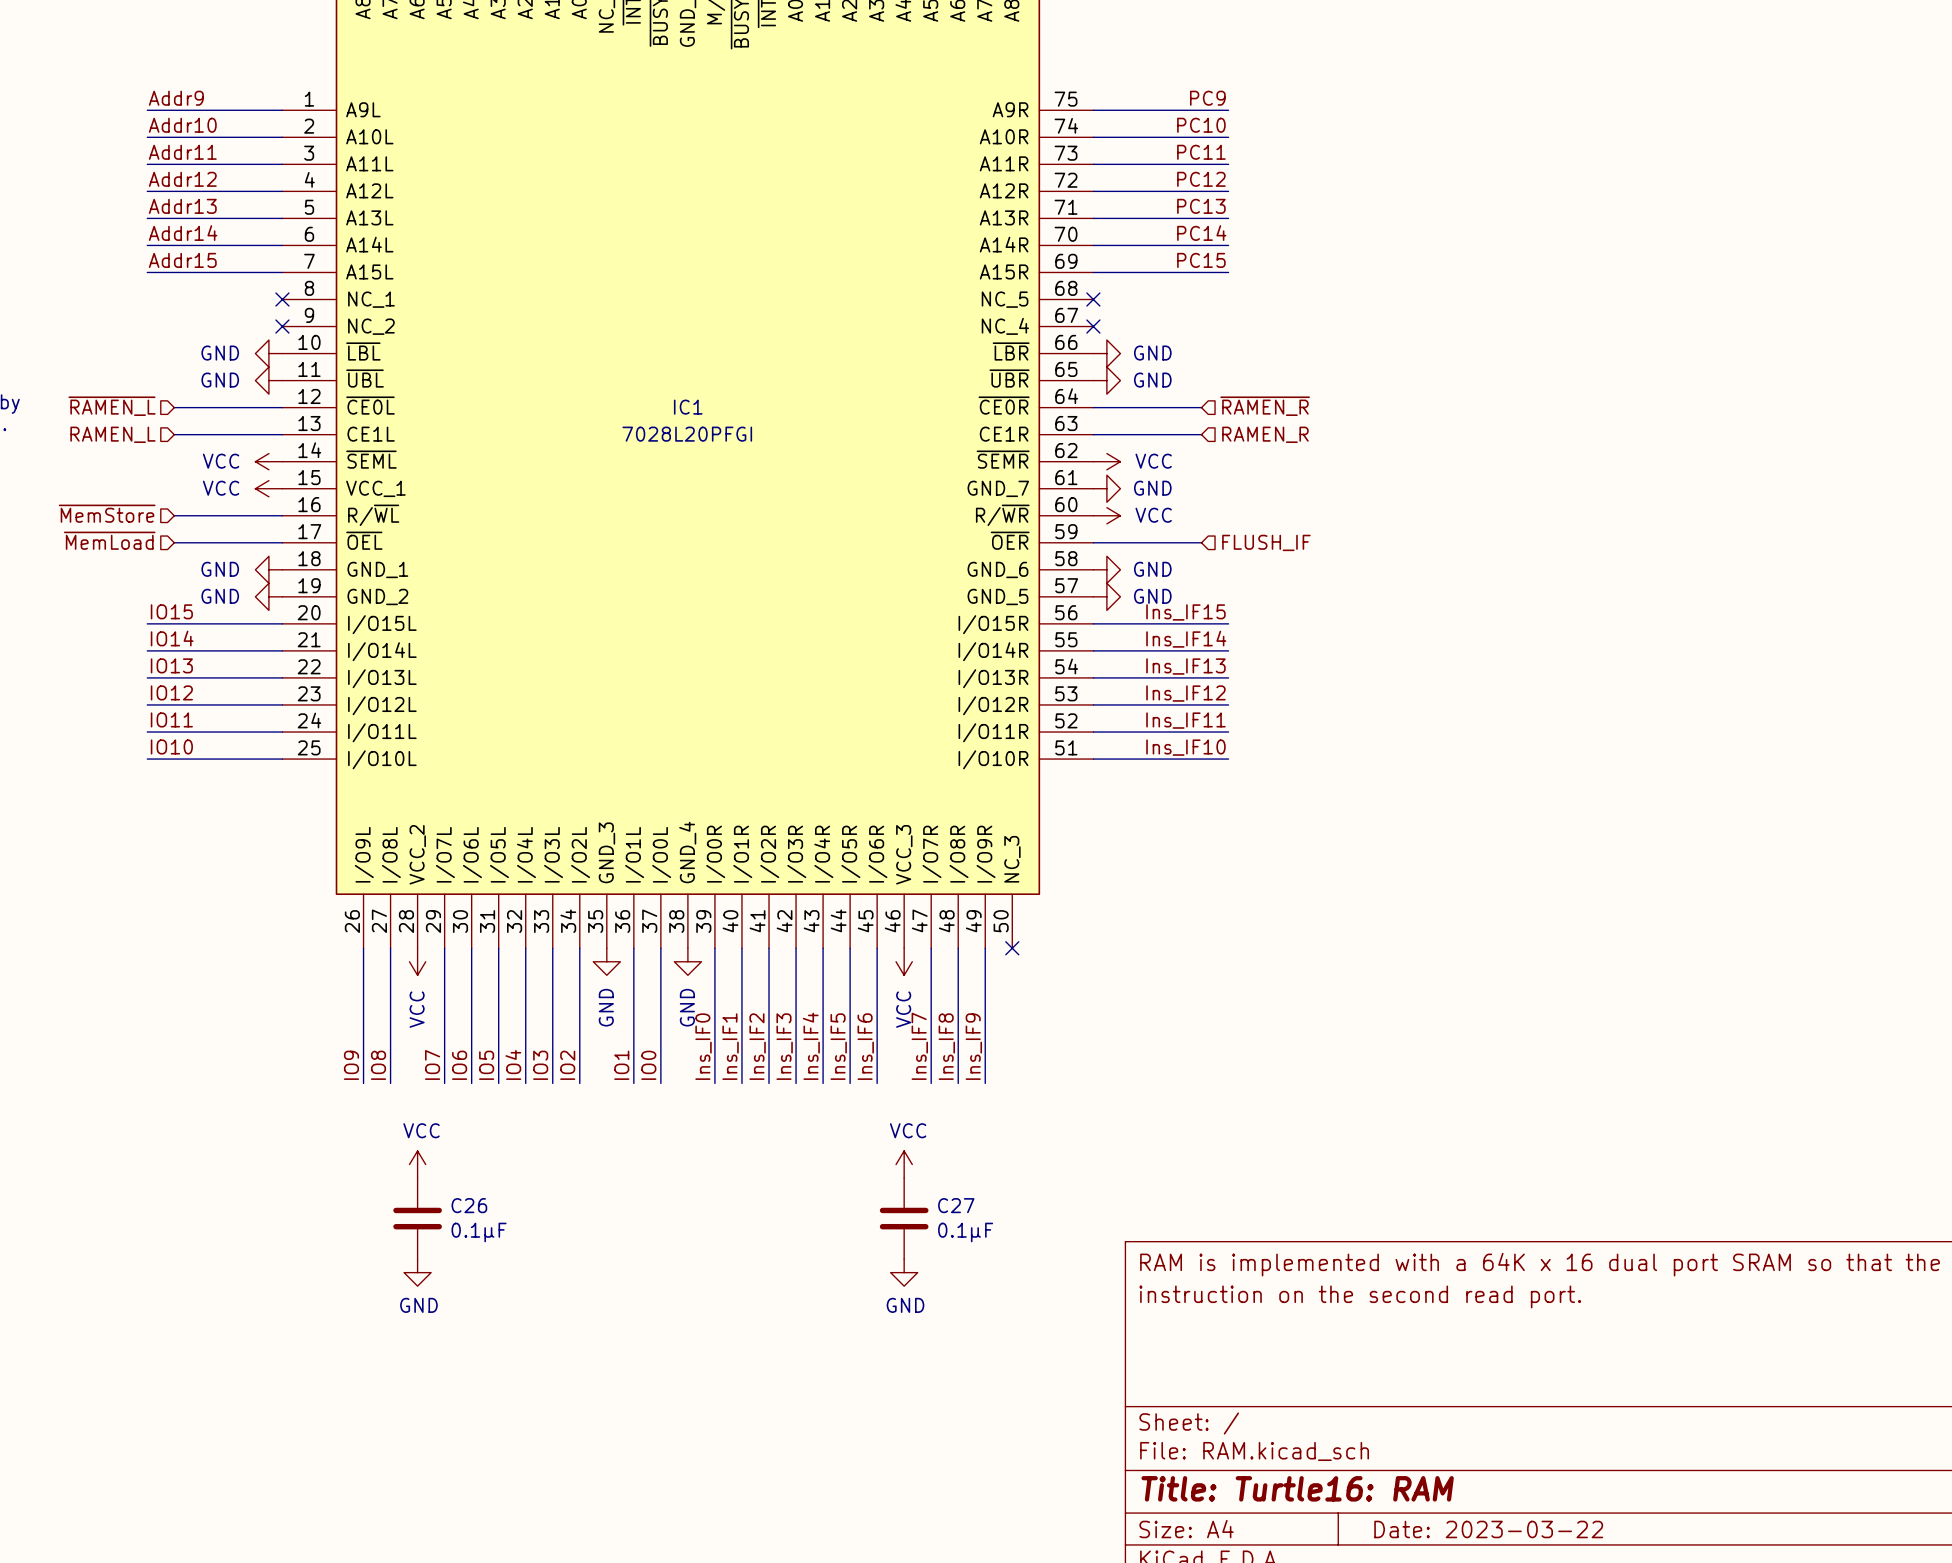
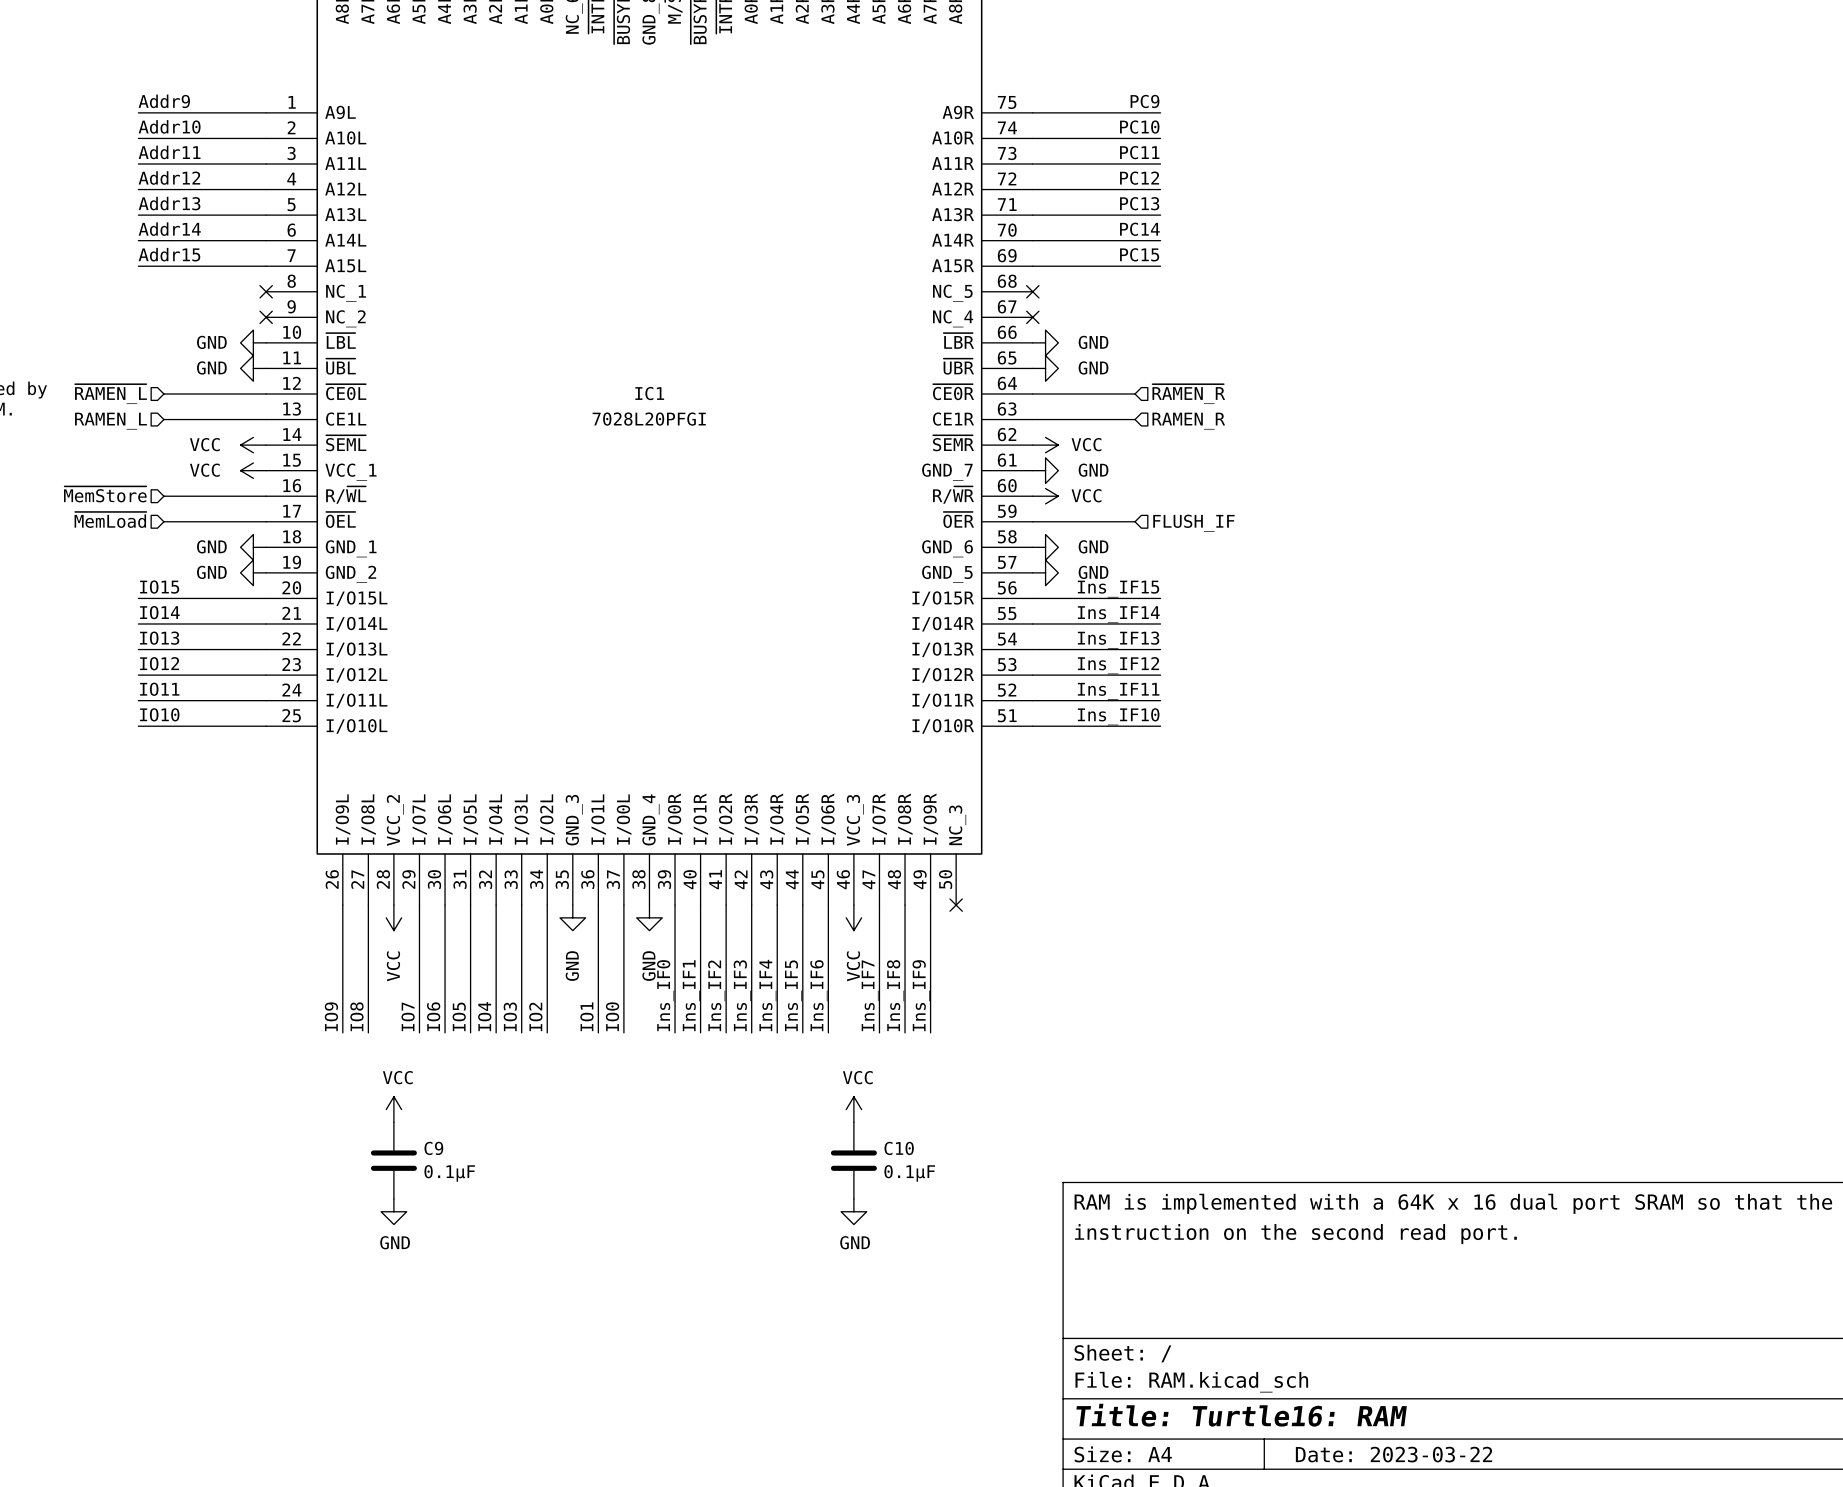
C26 name: C26 (469, 1205) -> C9 (433, 1148)
C27 name: C27 (956, 1205) -> C10 (899, 1148)

